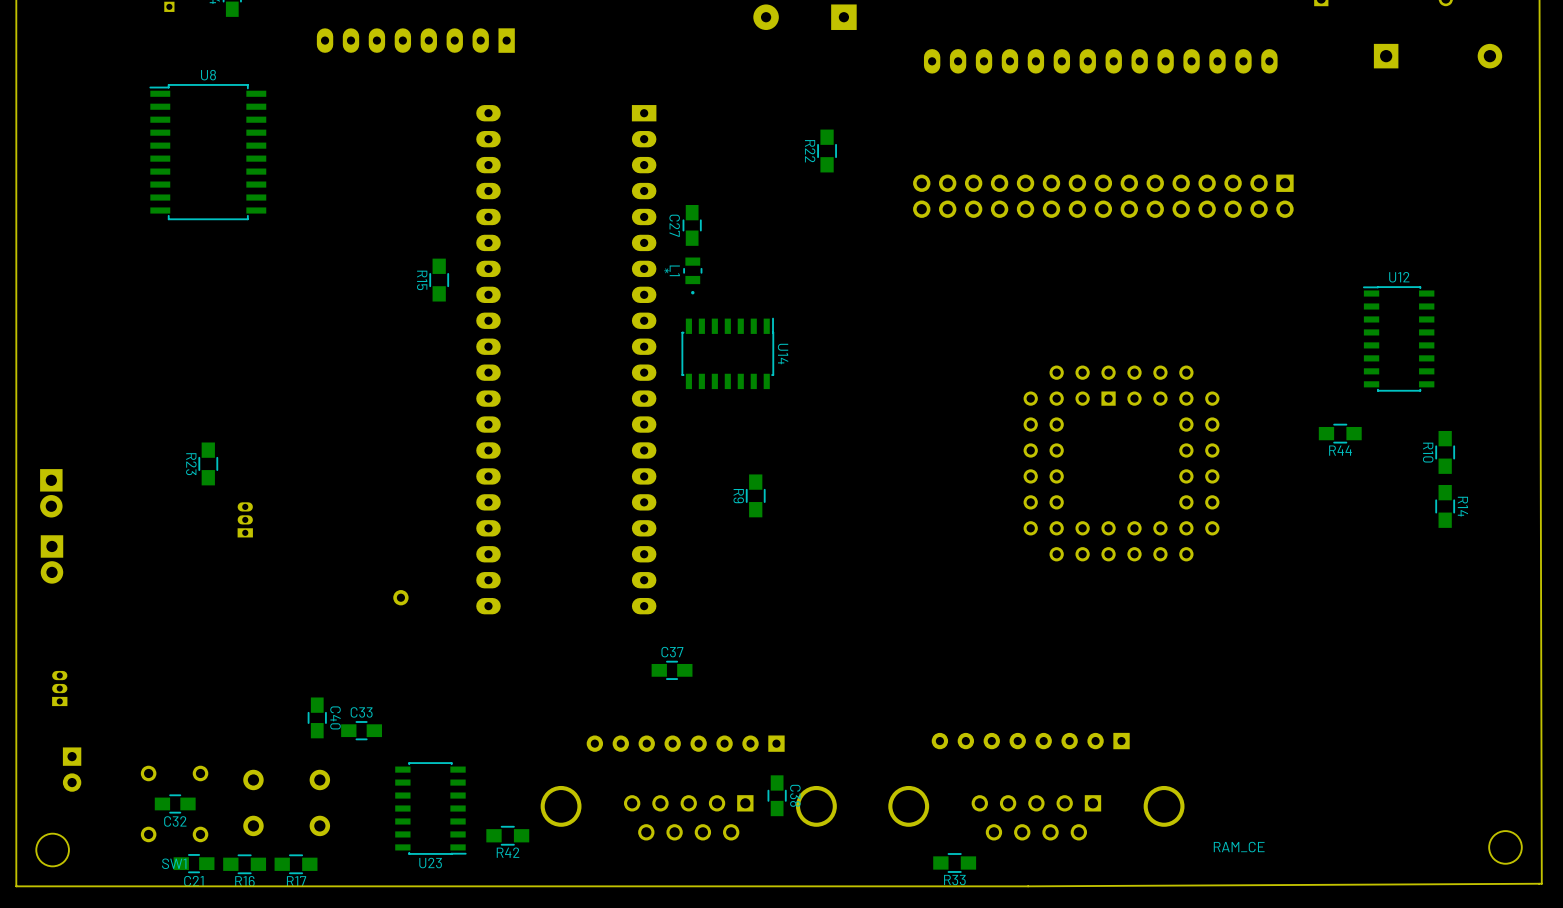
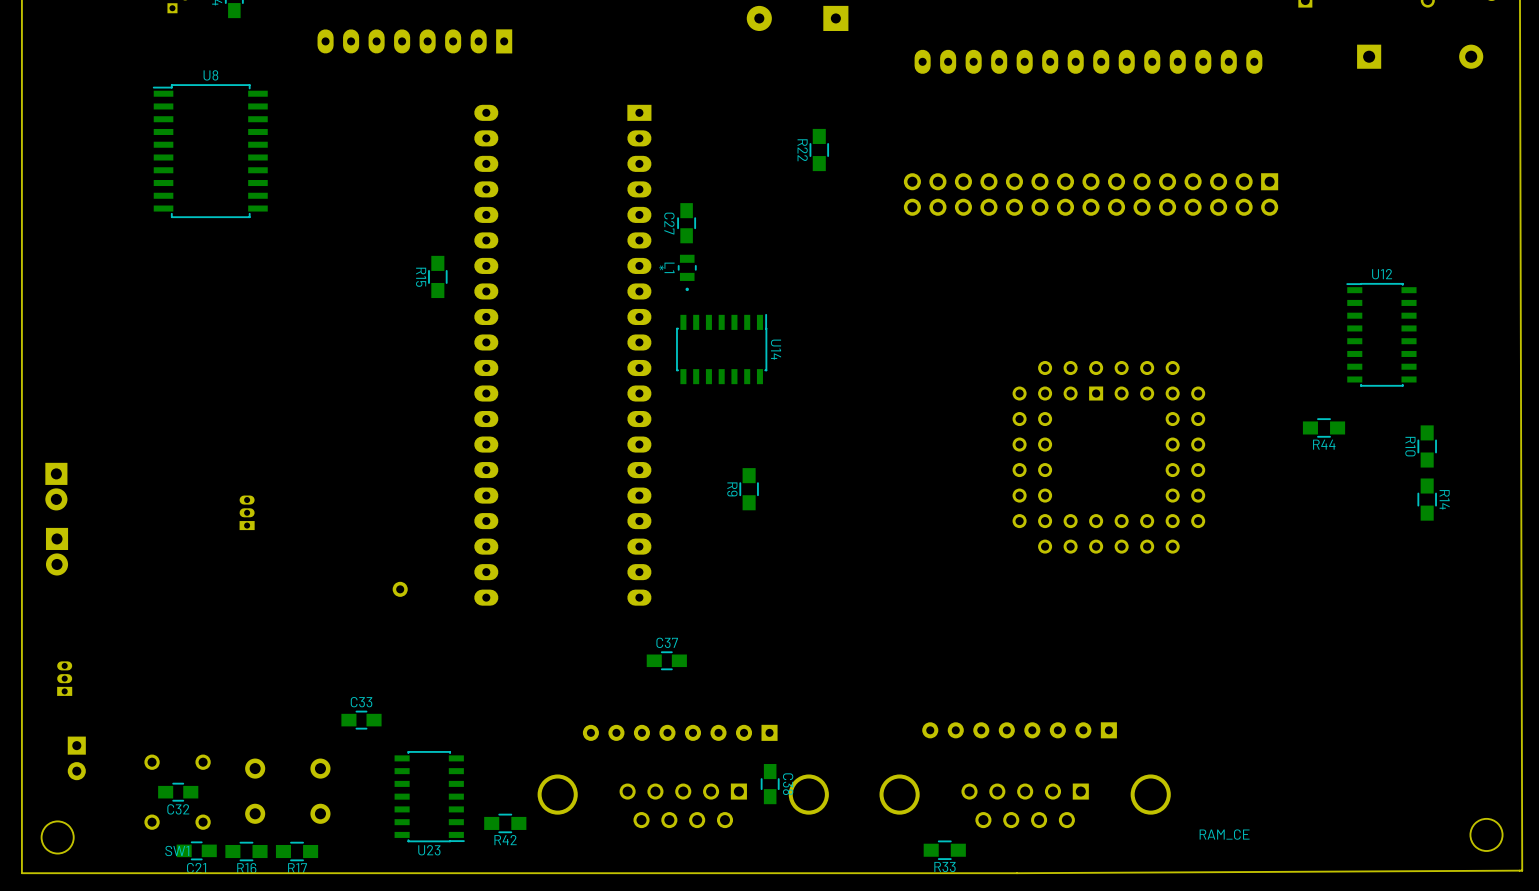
R23: (208, 463) -> none
C40: (317, 717) -> none

